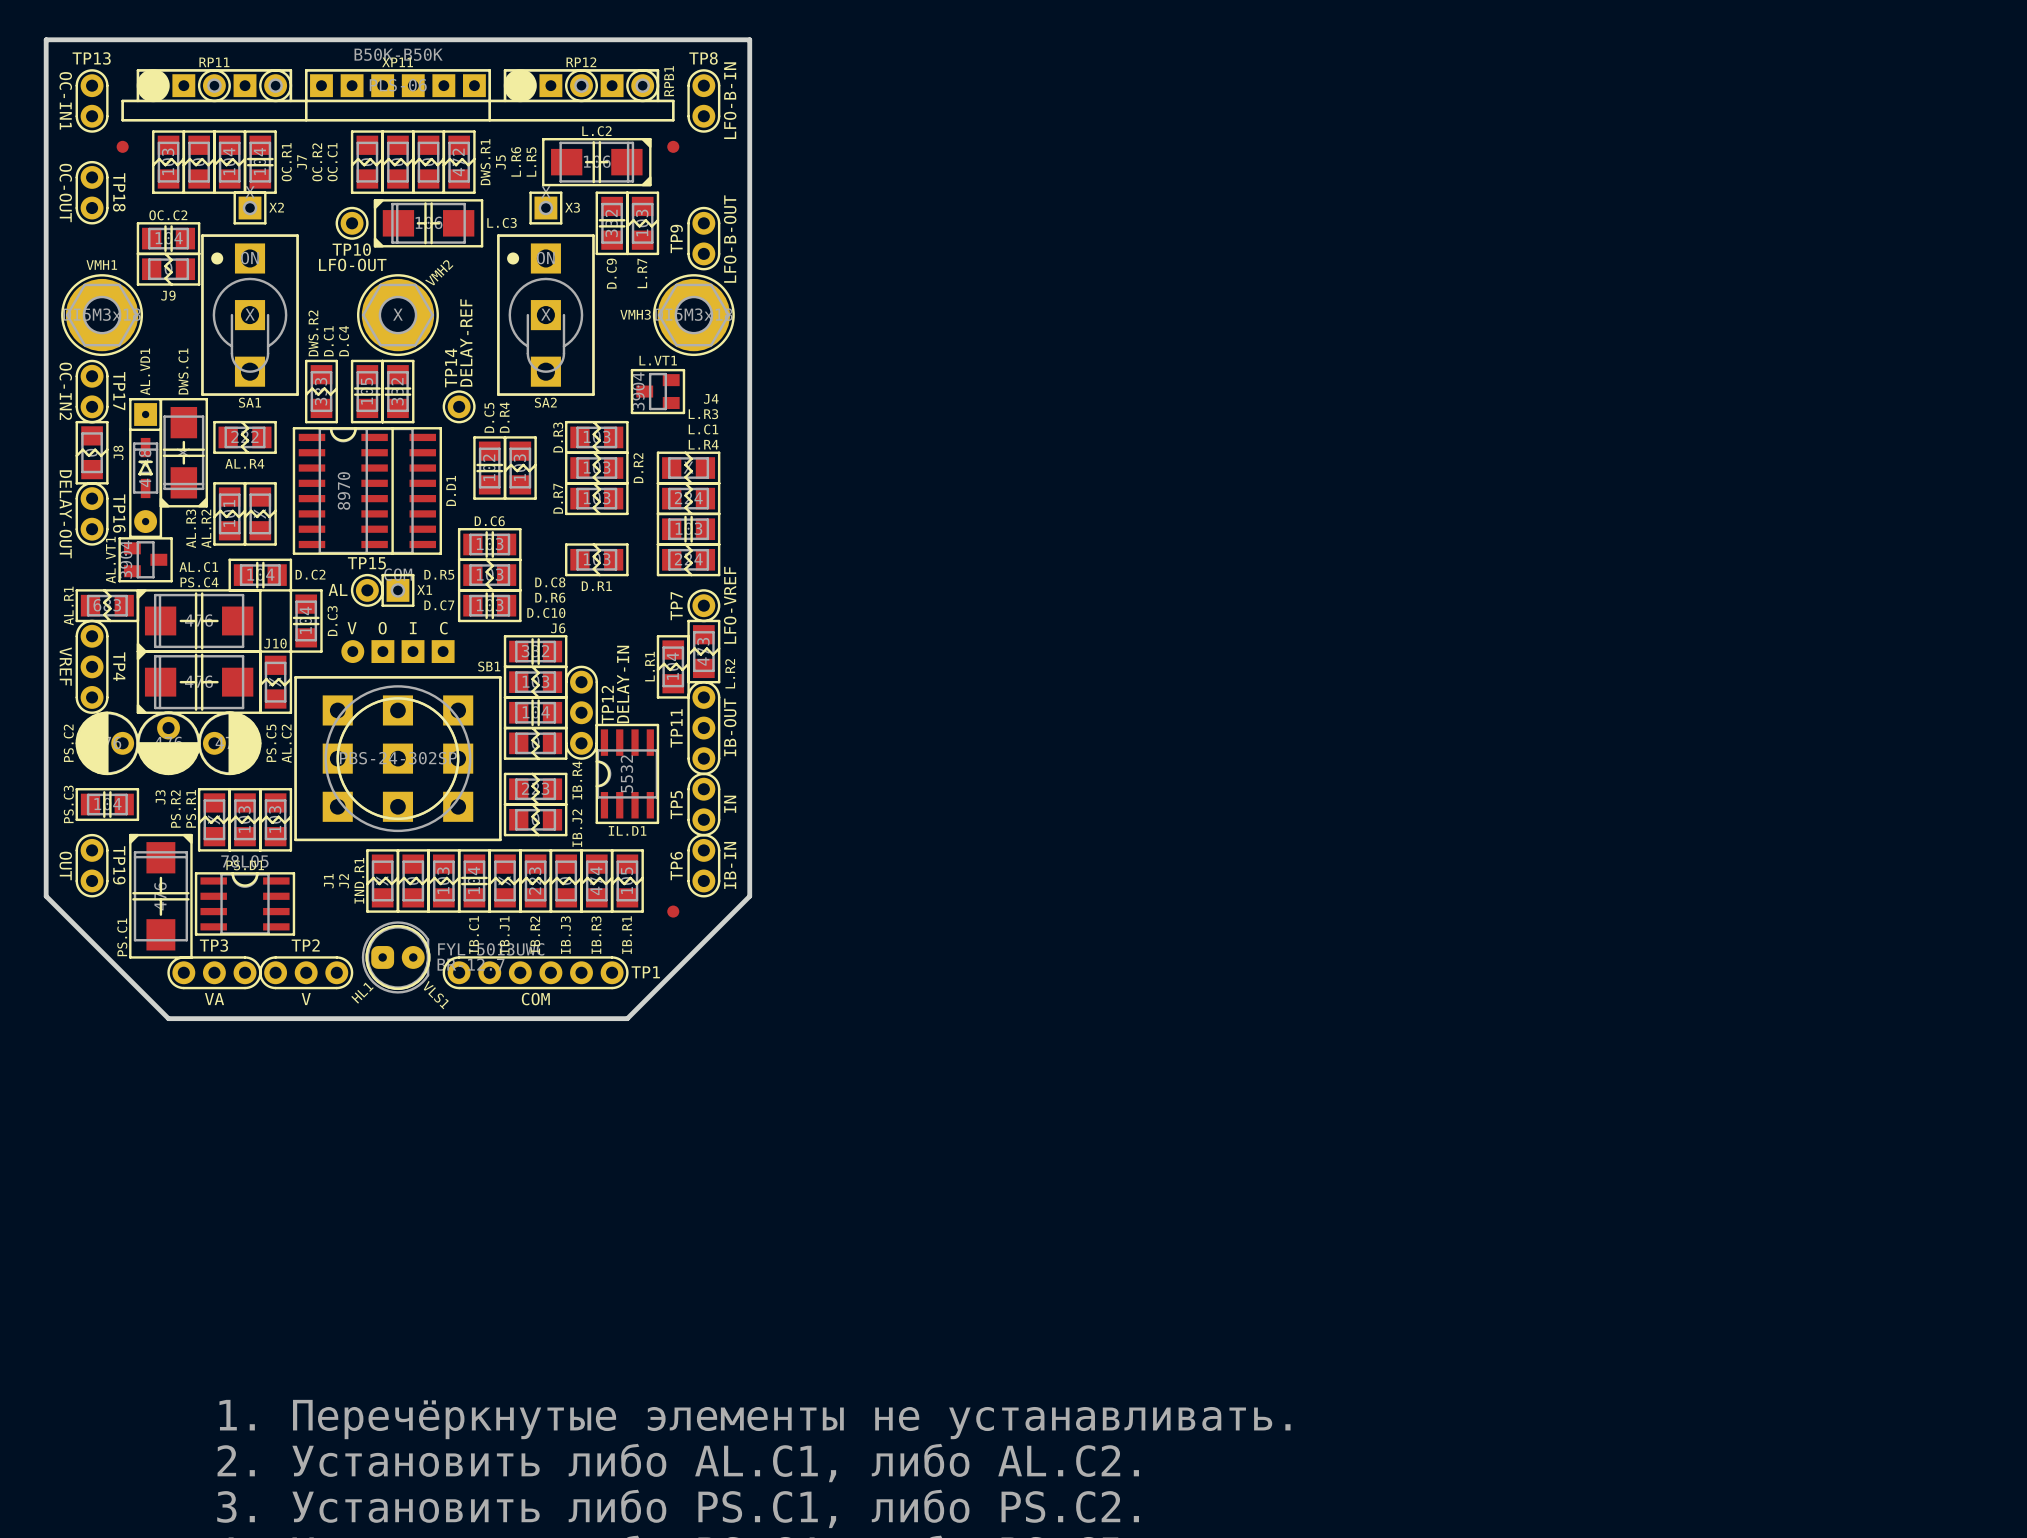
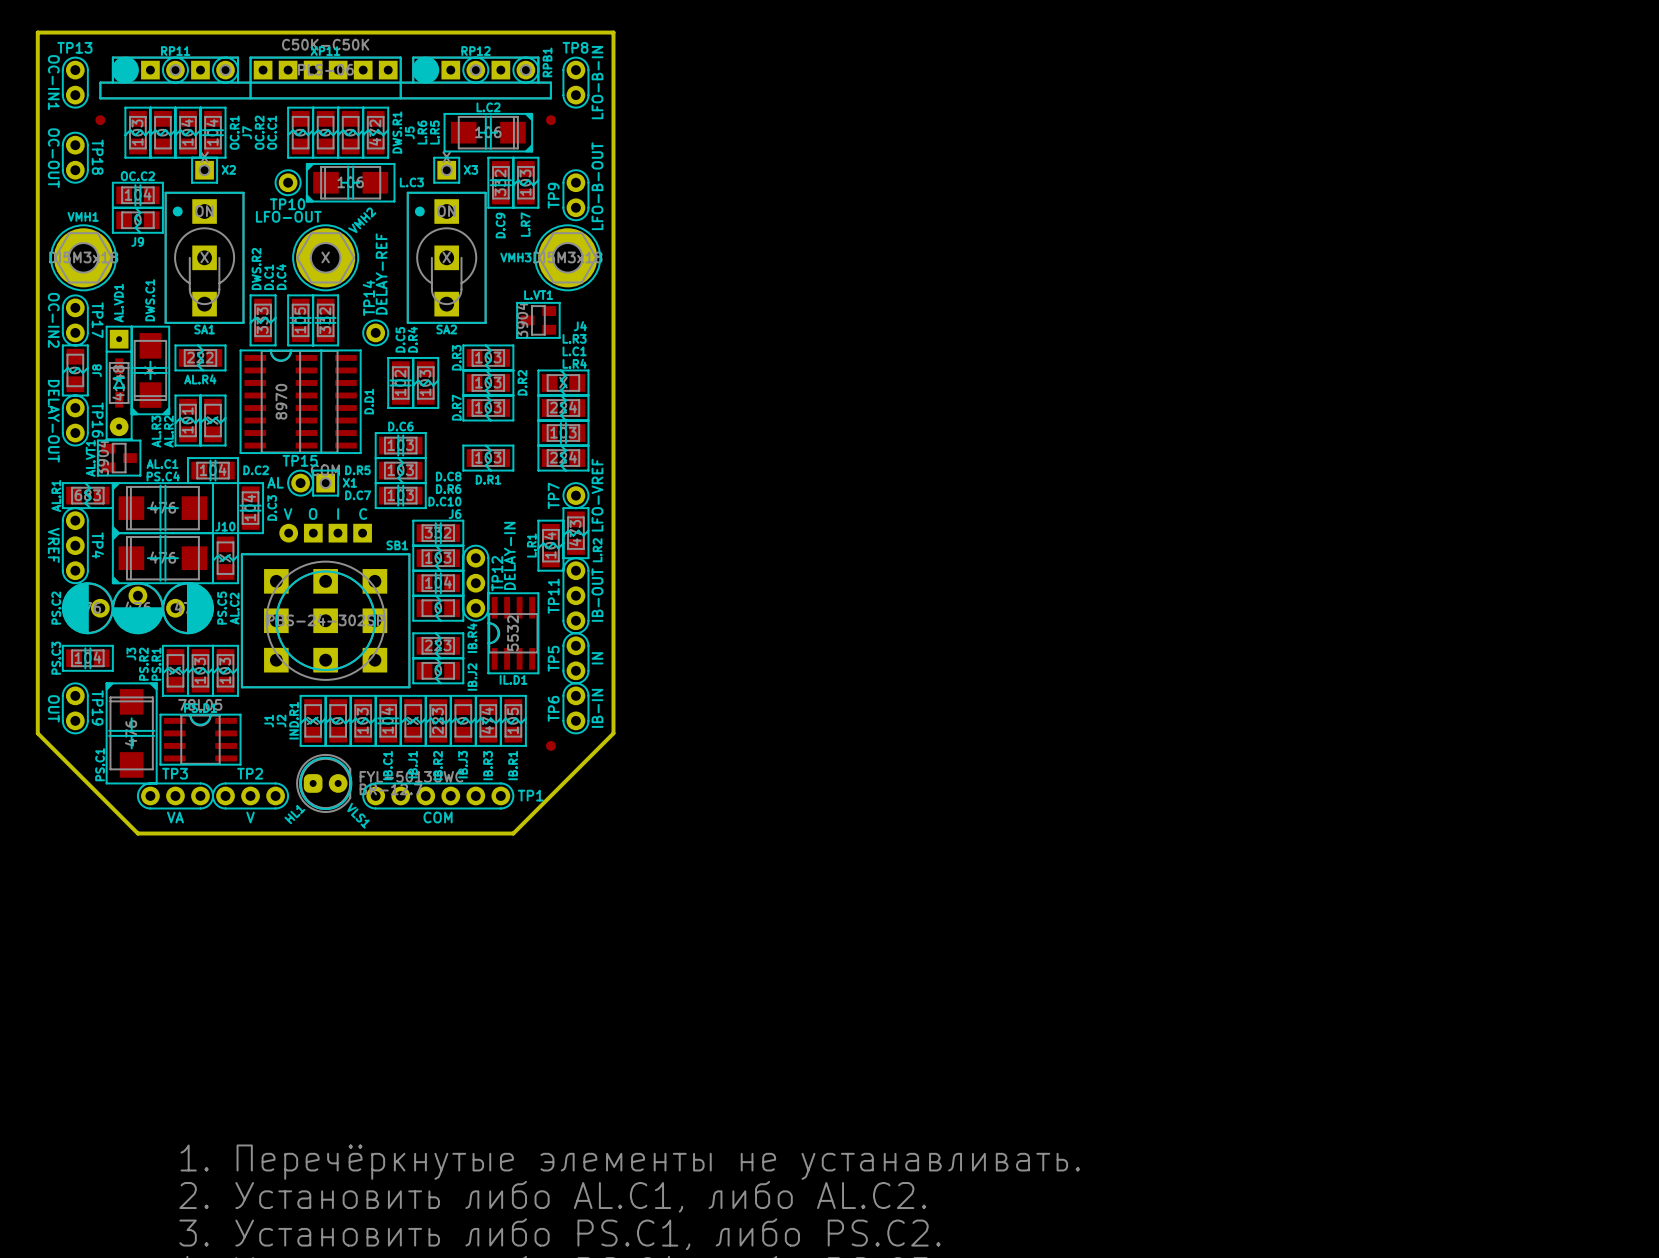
RPB1 value: B50K-B50K (398, 54) -> C50K-C50K (325, 44)

